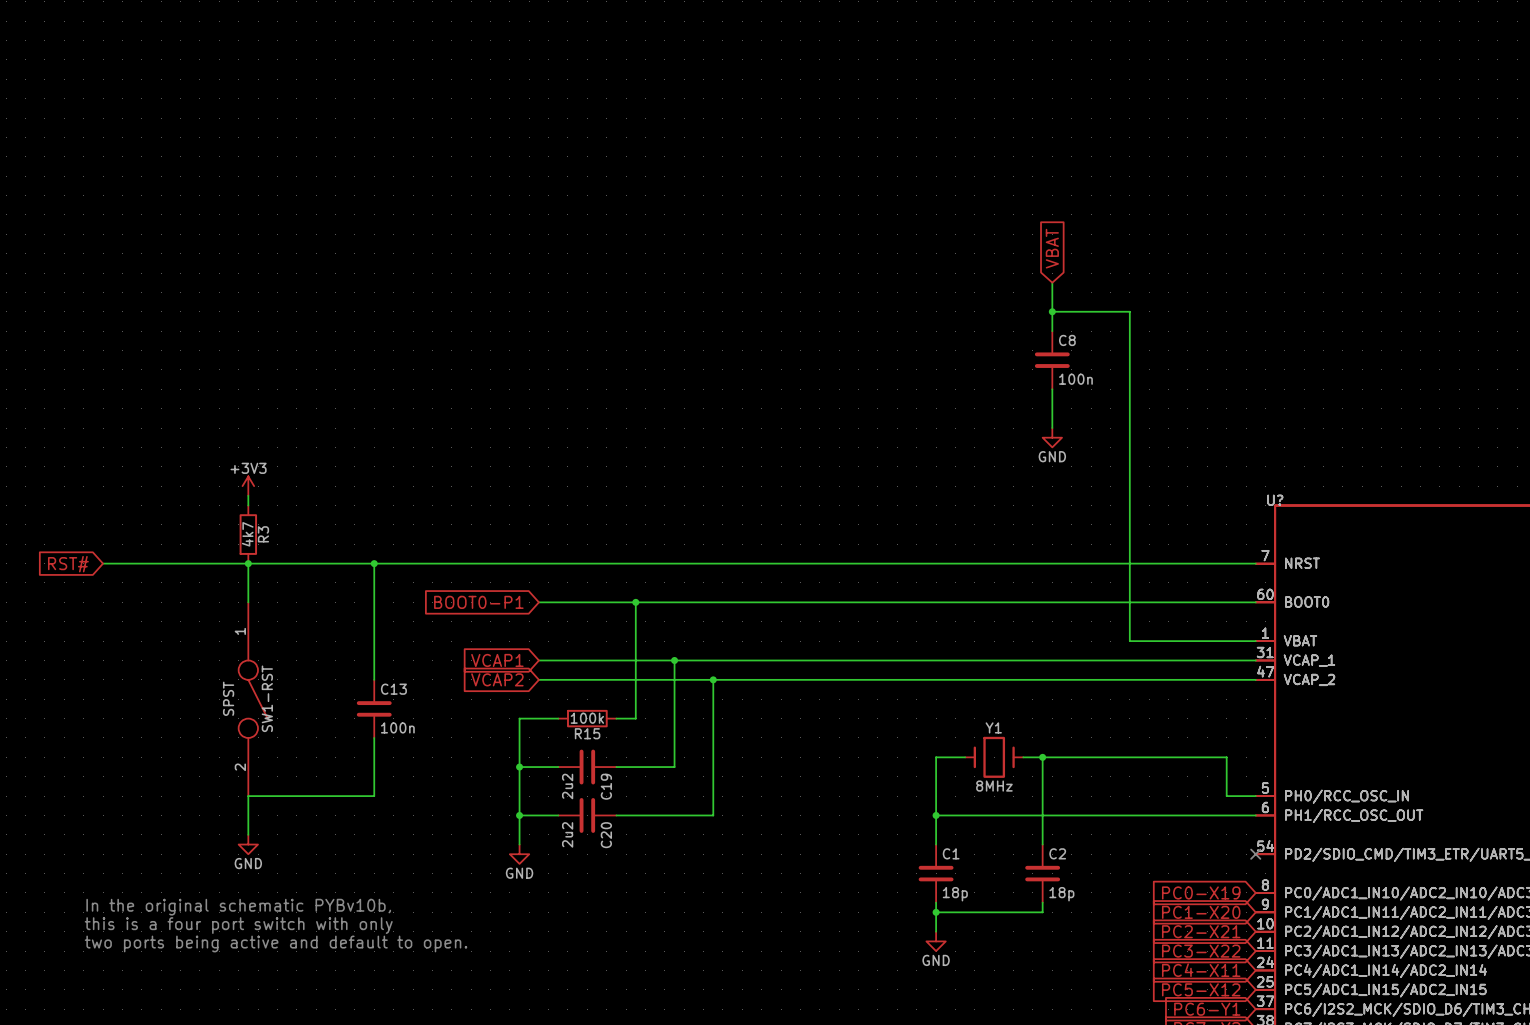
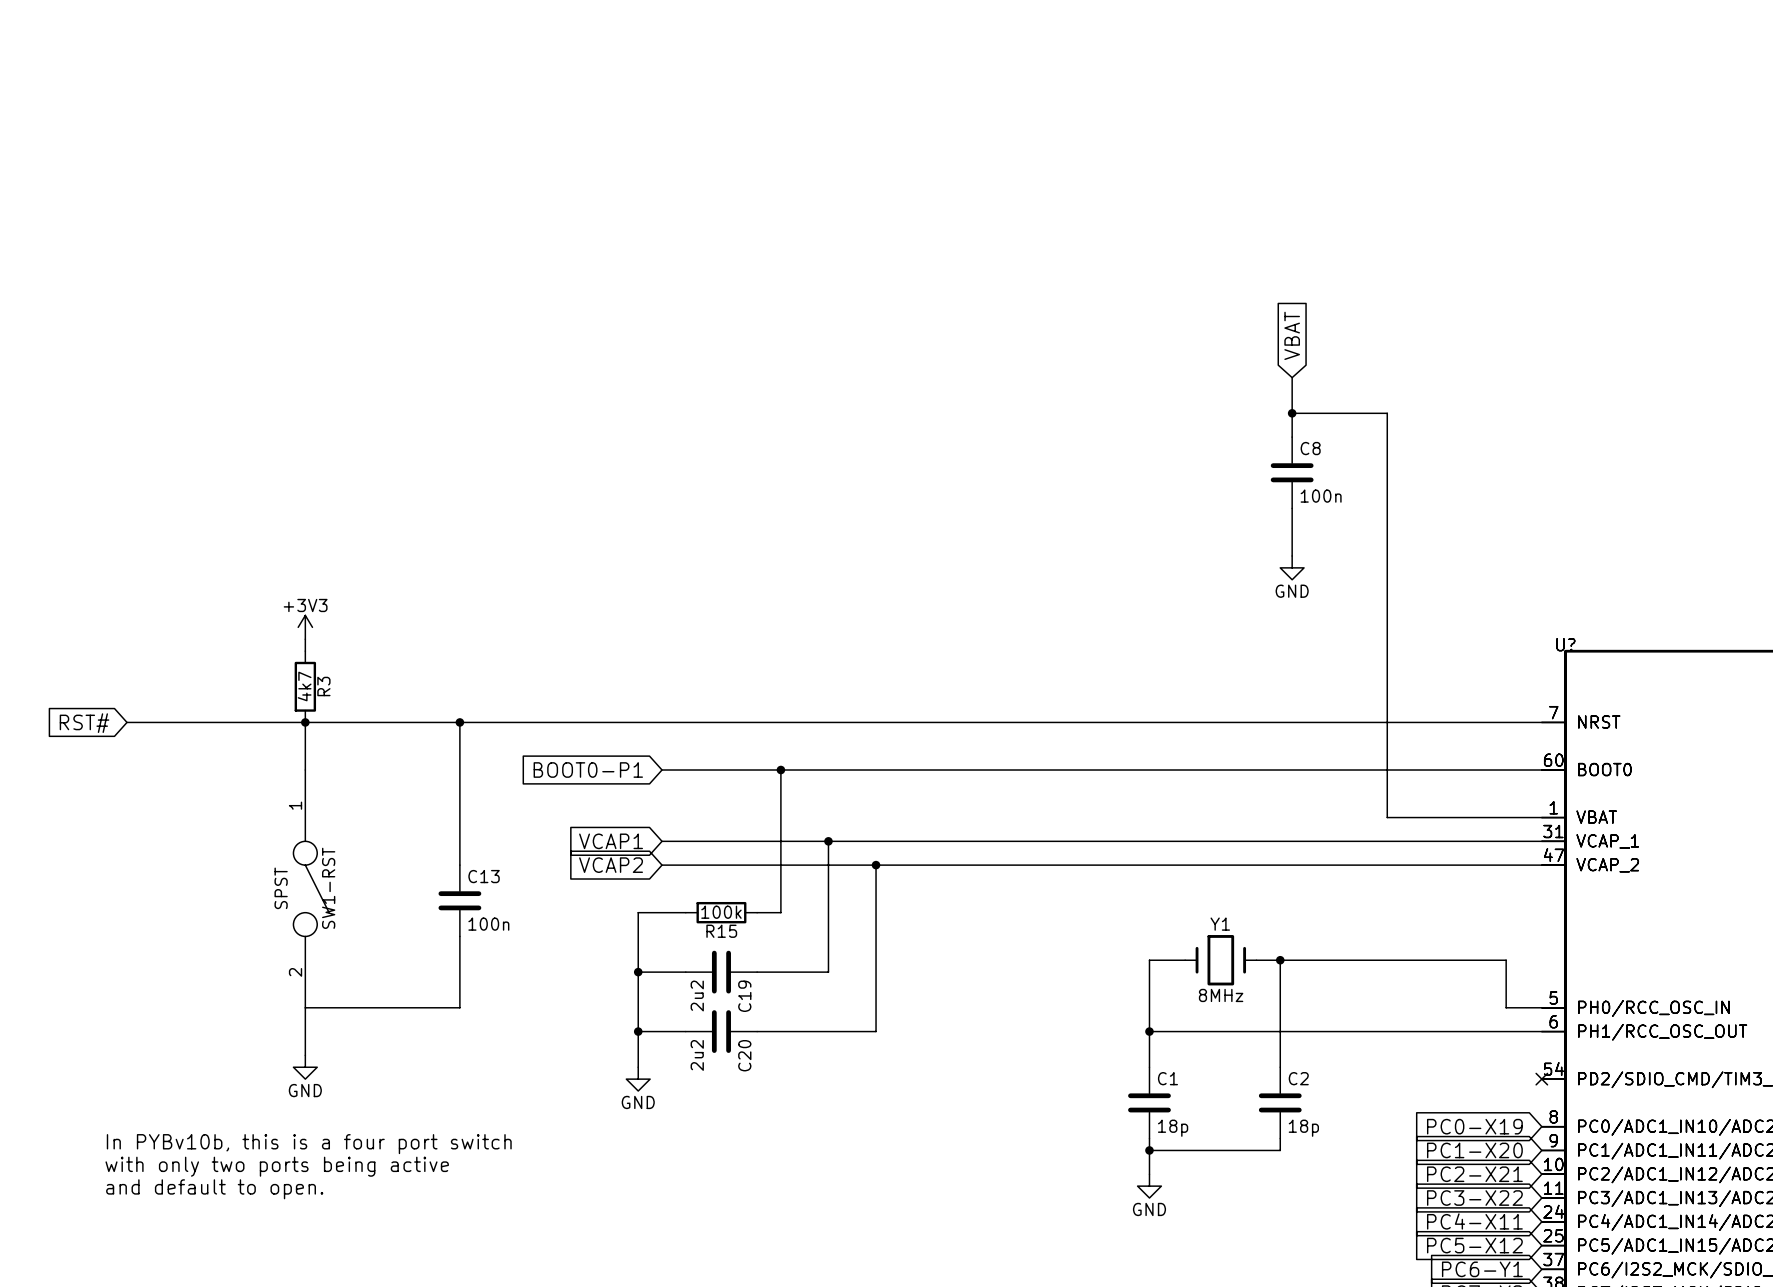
text: In the original schematic PYBv10b, (238, 907) -> In PYBv10b, this is a four port switch (309, 1144)
text: this is a four port switch with only (238, 925) -> with only two ports being active (277, 1166)
text: two ports being active and default to open. (276, 943) -> and default to open. (214, 1189)

